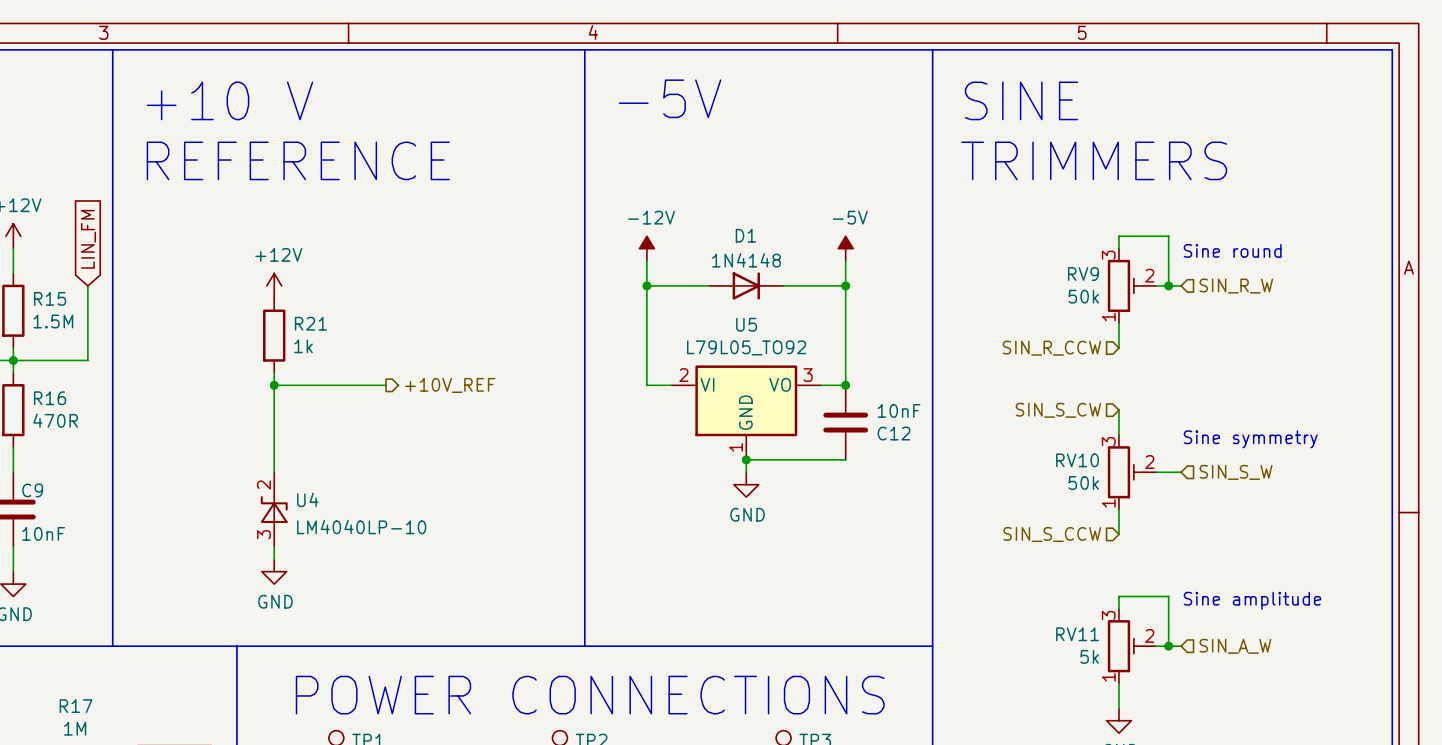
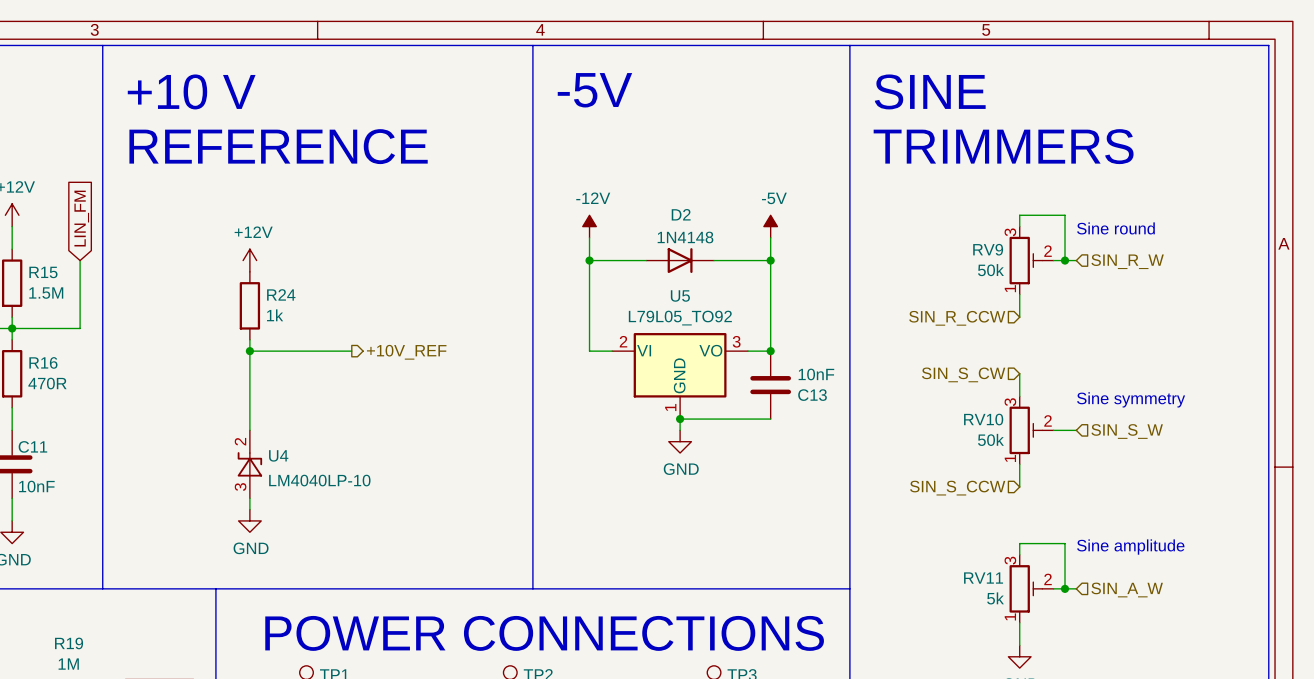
D1 name: D1 (745, 235) -> D2 (681, 214)
R21 name: R21 (310, 323) -> R24 (281, 294)
C12 name: C12 (894, 433) -> C13 (812, 395)
C9 name: C9 (32, 490) -> C11 (32, 446)
R17 name: R17 (76, 706) -> R19 (69, 643)

